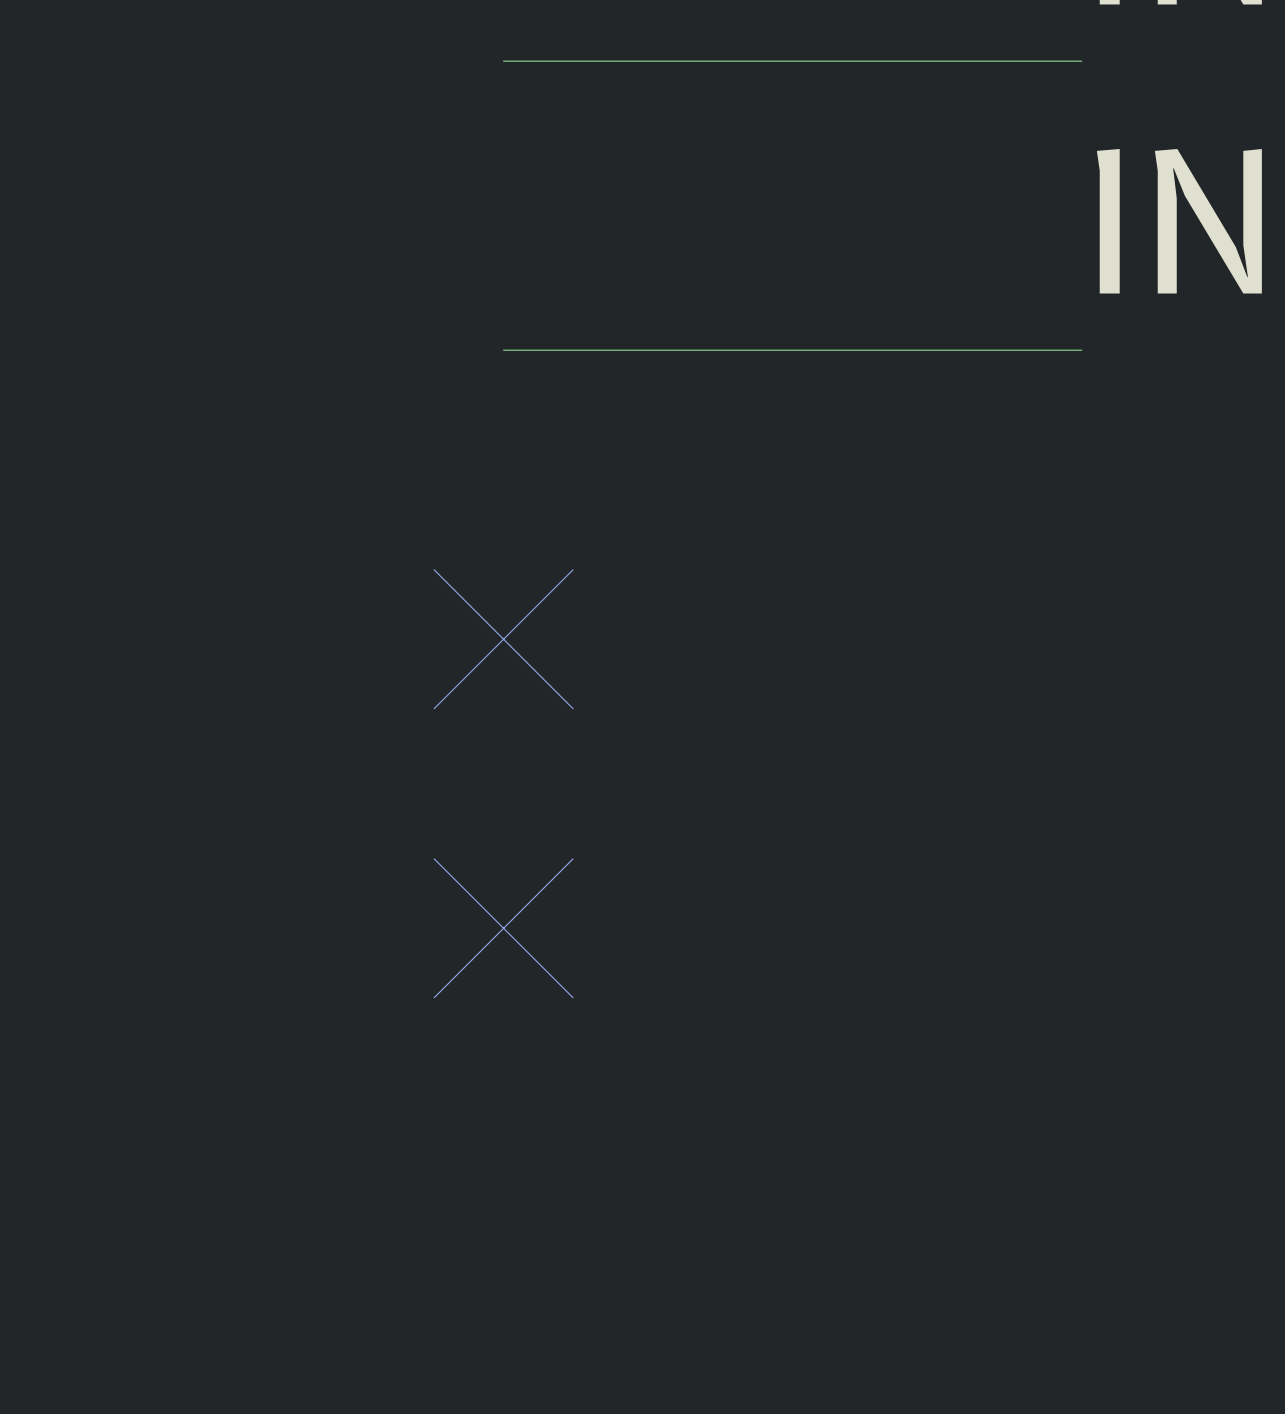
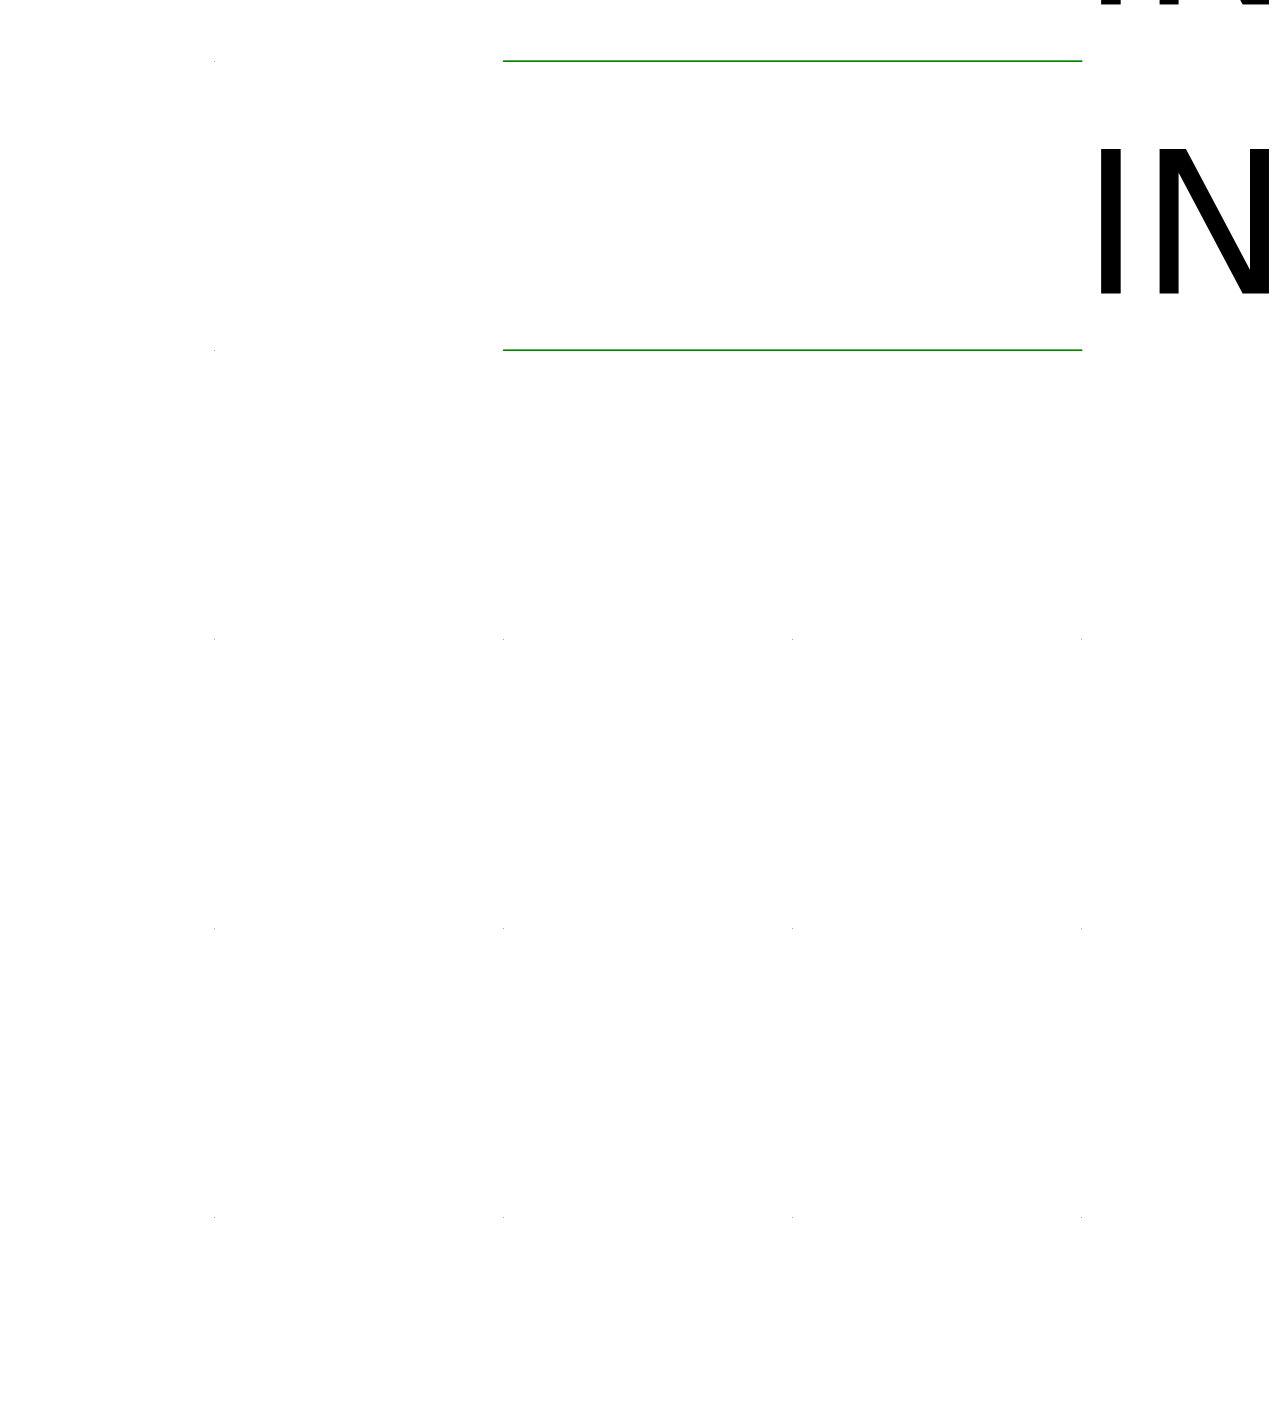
no-connect mark: (503, 639) -> none
no-connect mark: (503, 928) -> none

